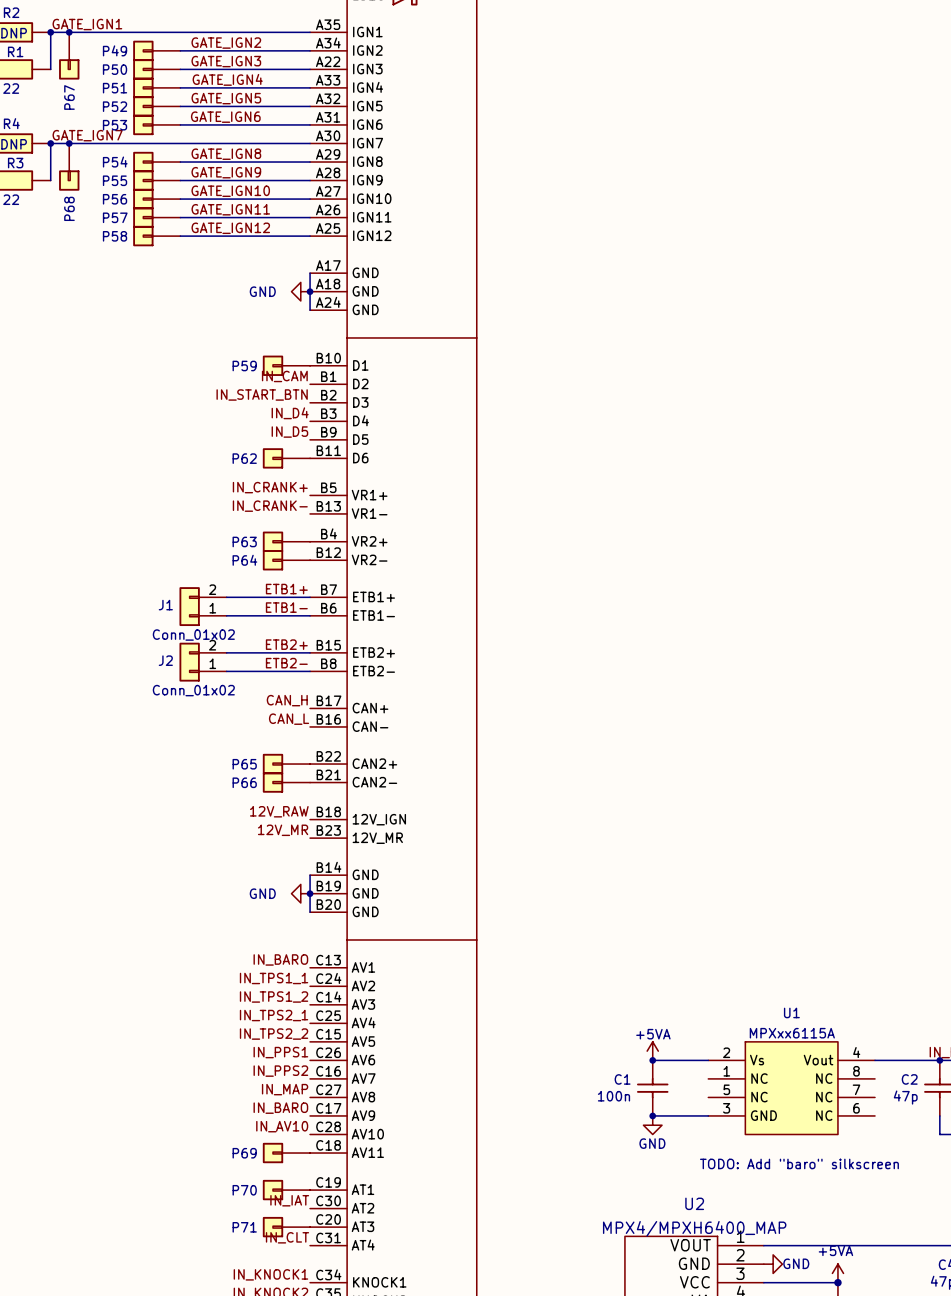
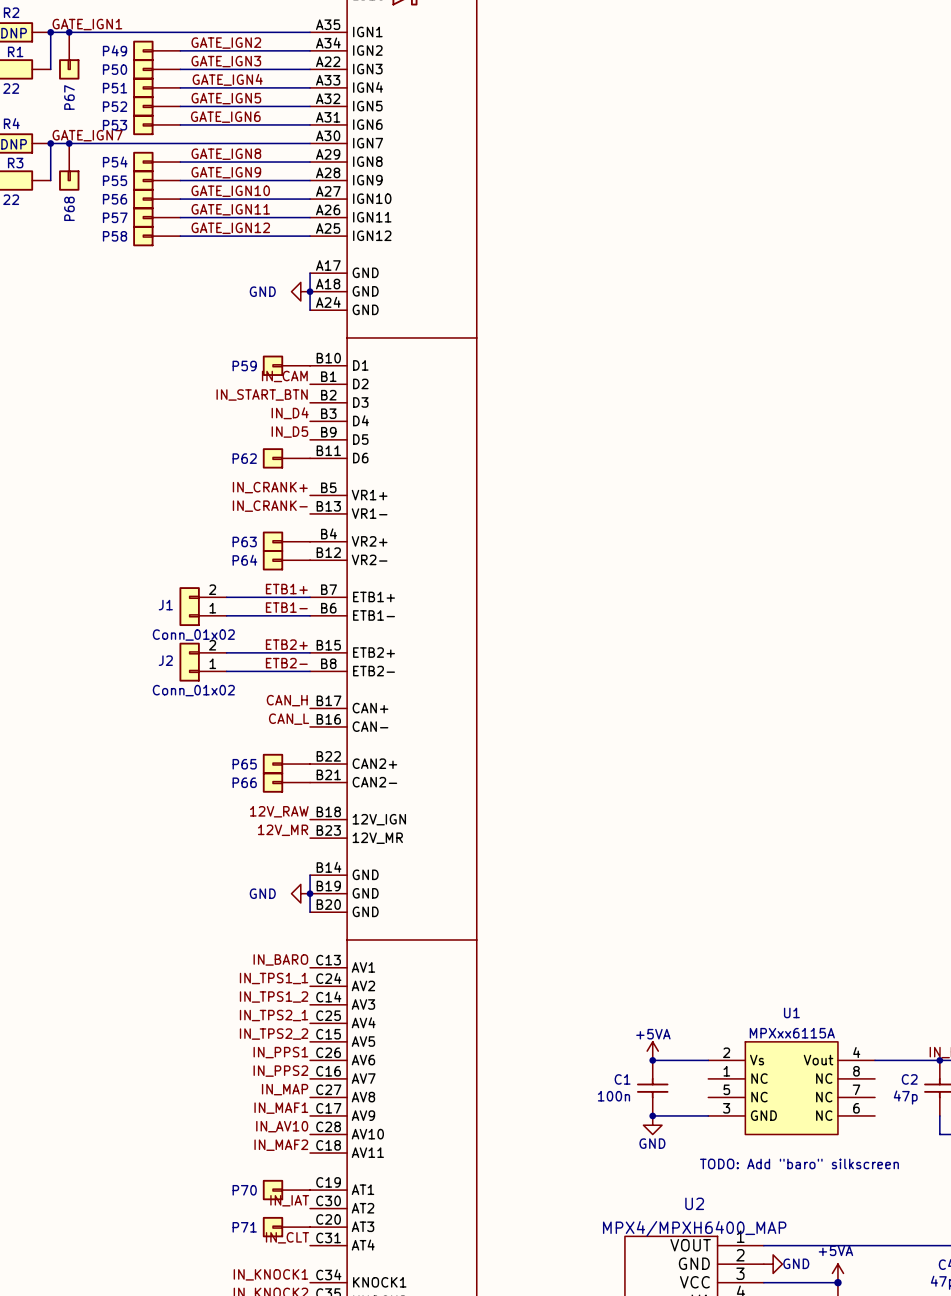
label: IN_BARO (280, 1108) -> IN_MAF1 (281, 1108)
label: none -> IN_MAF2 (281, 1145)
P69: (286, 1153) -> none

